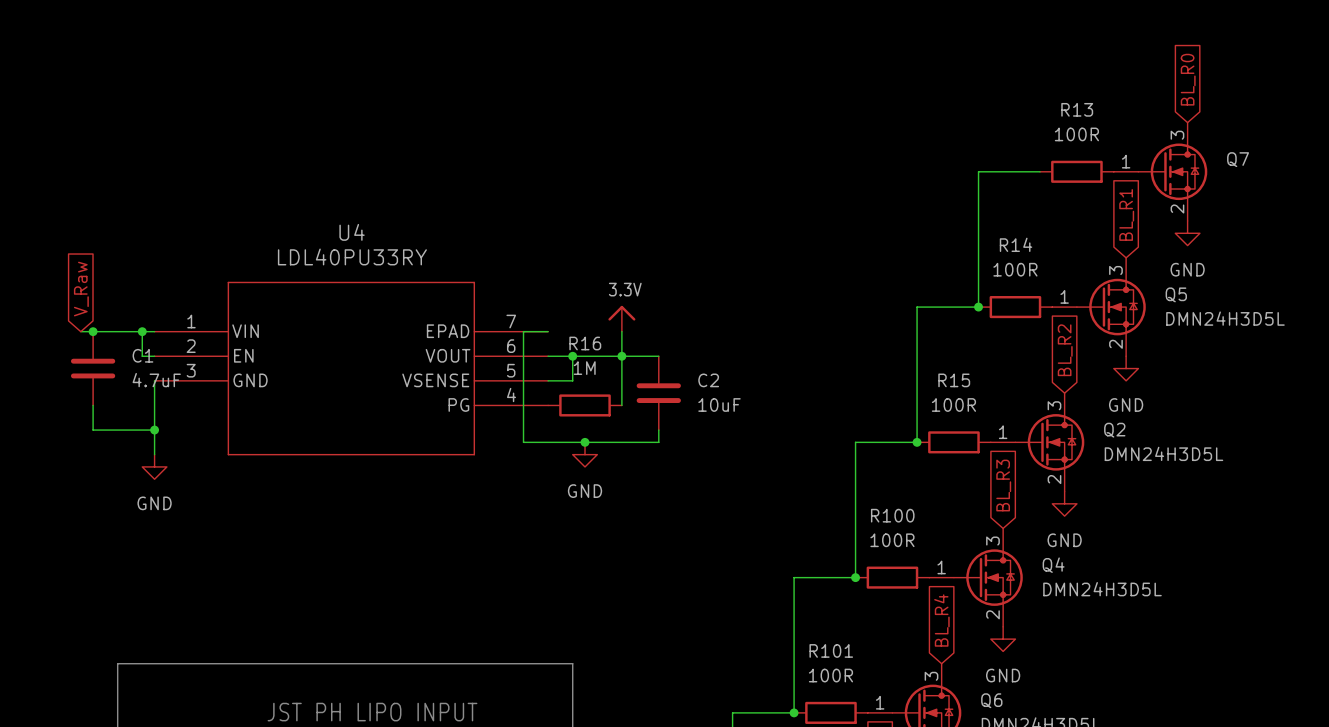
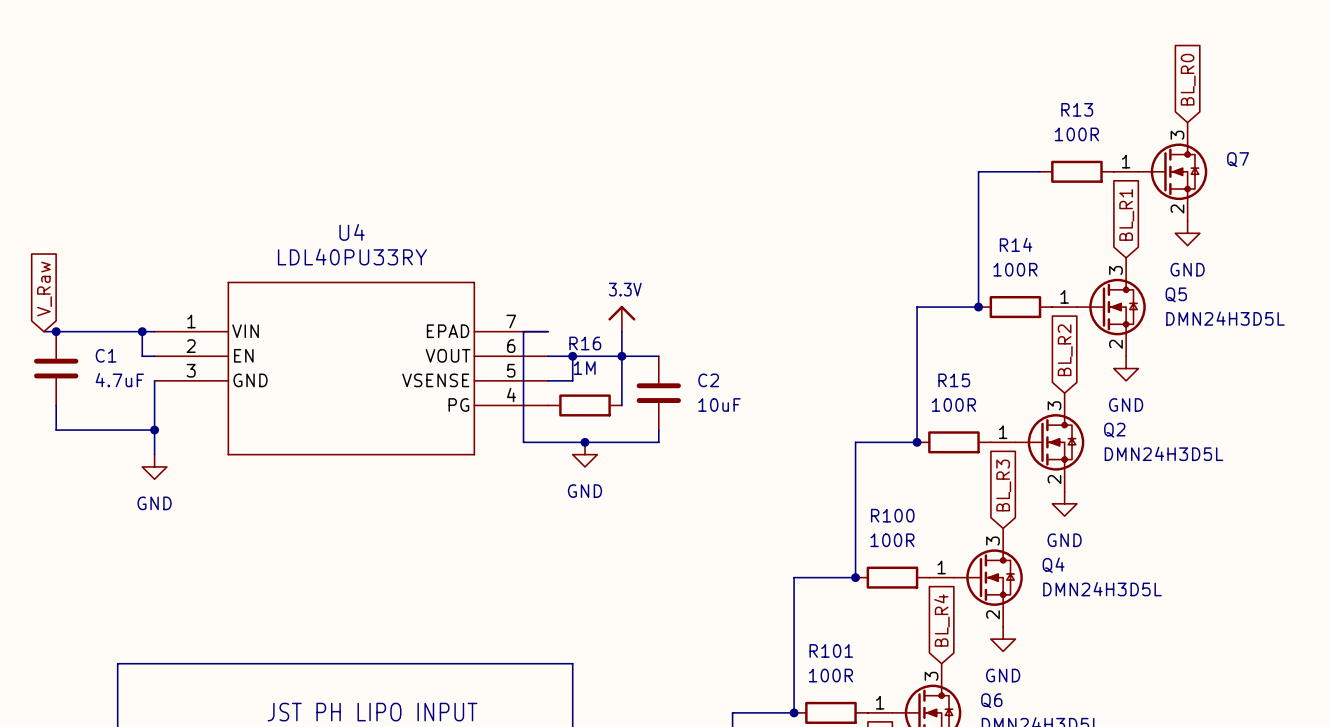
global label position: V_Raw (81, 289) -> V_Raw (44, 289)
wire: none -> (43, 331) (80, 331)
junction position: (93, 331) -> (56, 331)
C1 position: (93, 368) -> (56, 368)
wire: (93, 405) (93, 430) -> (56, 405) (56, 430) (93, 430)

